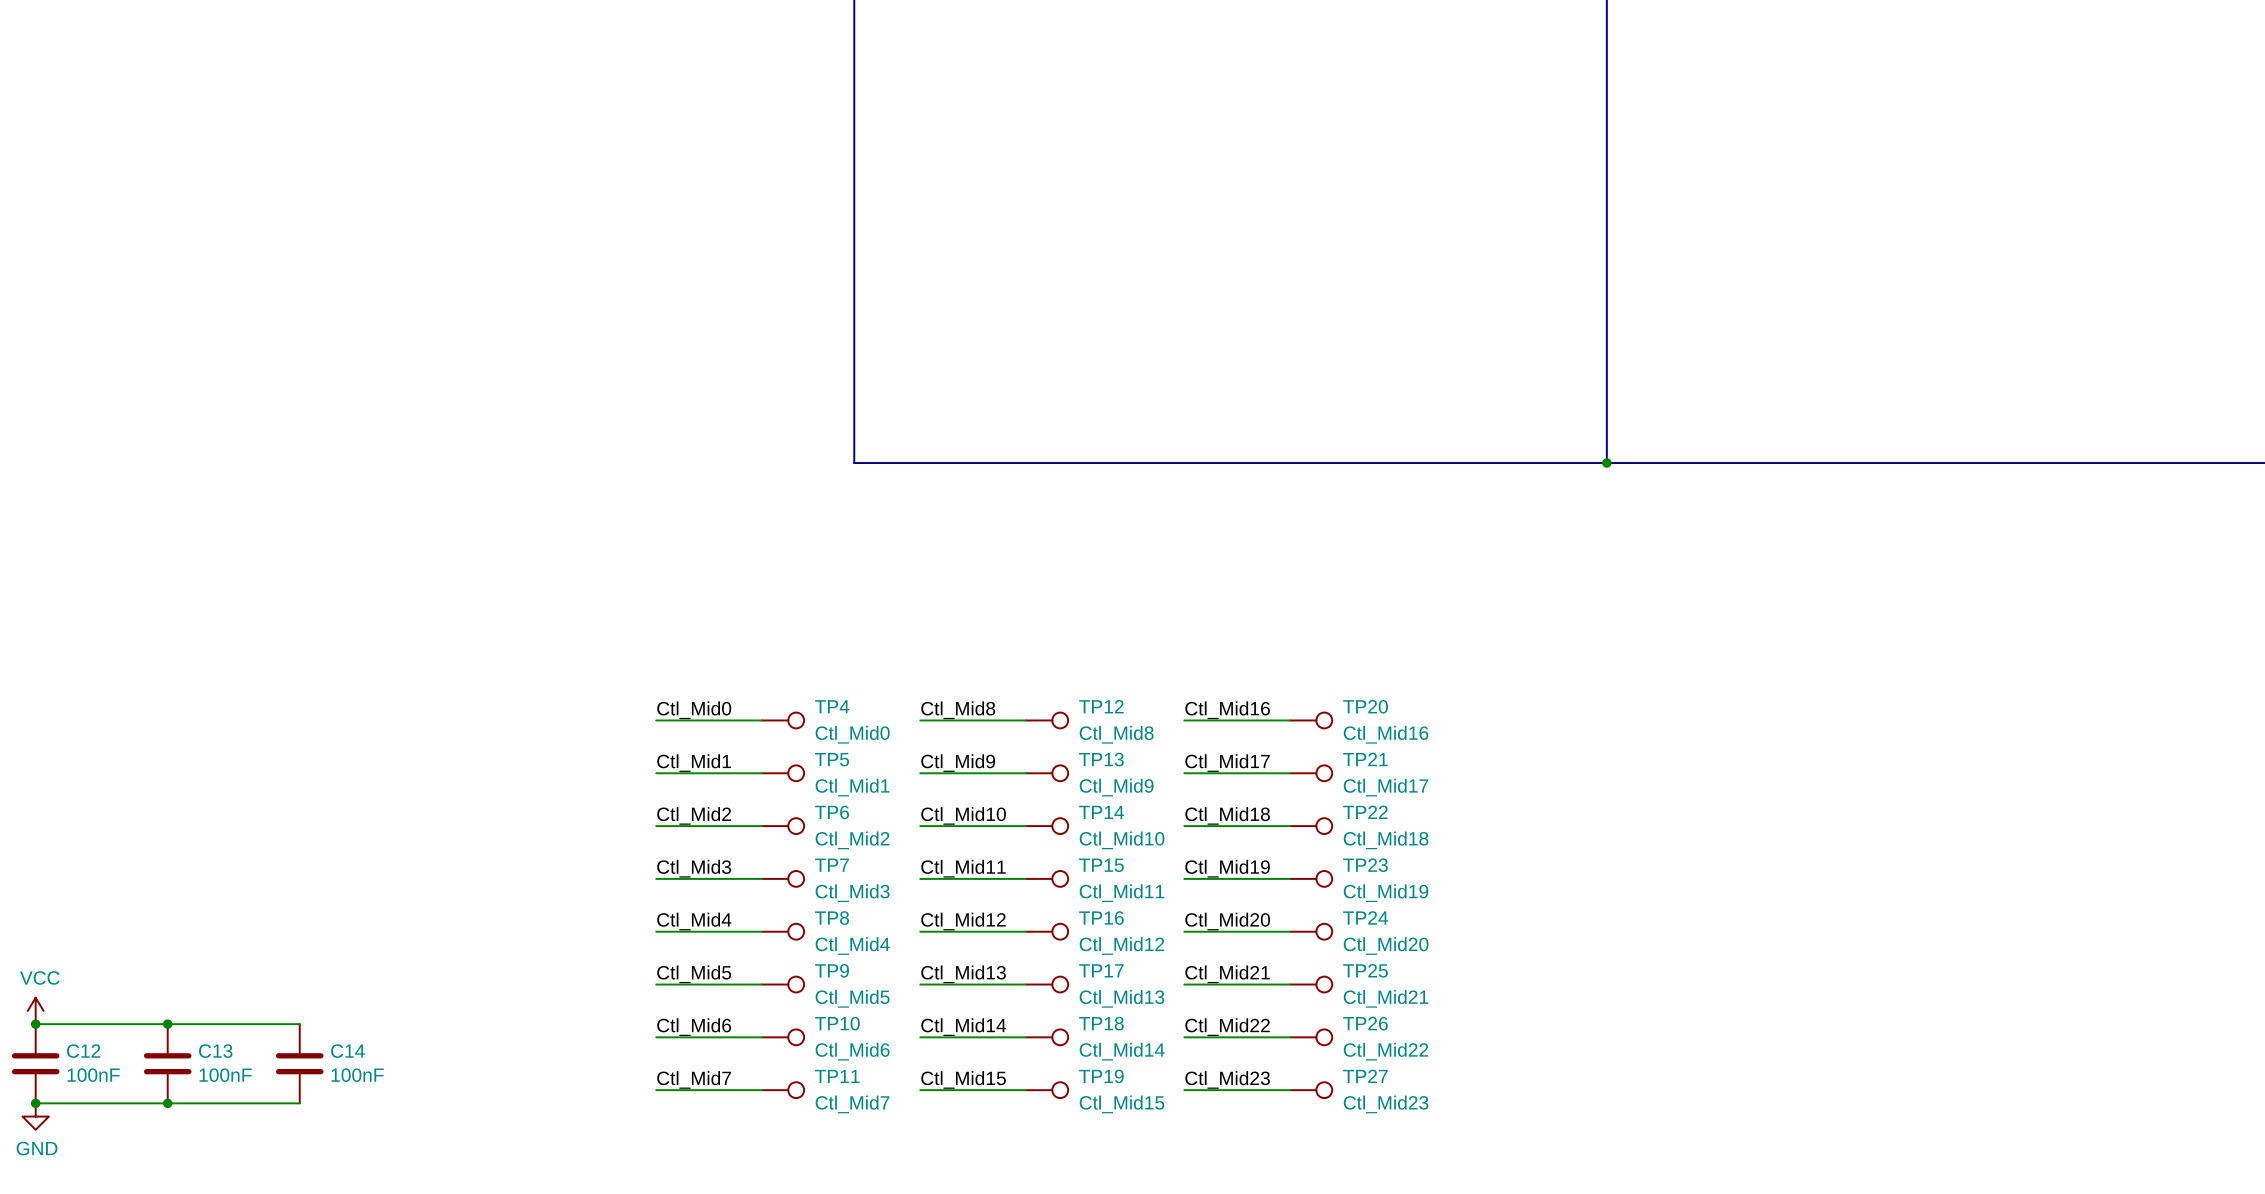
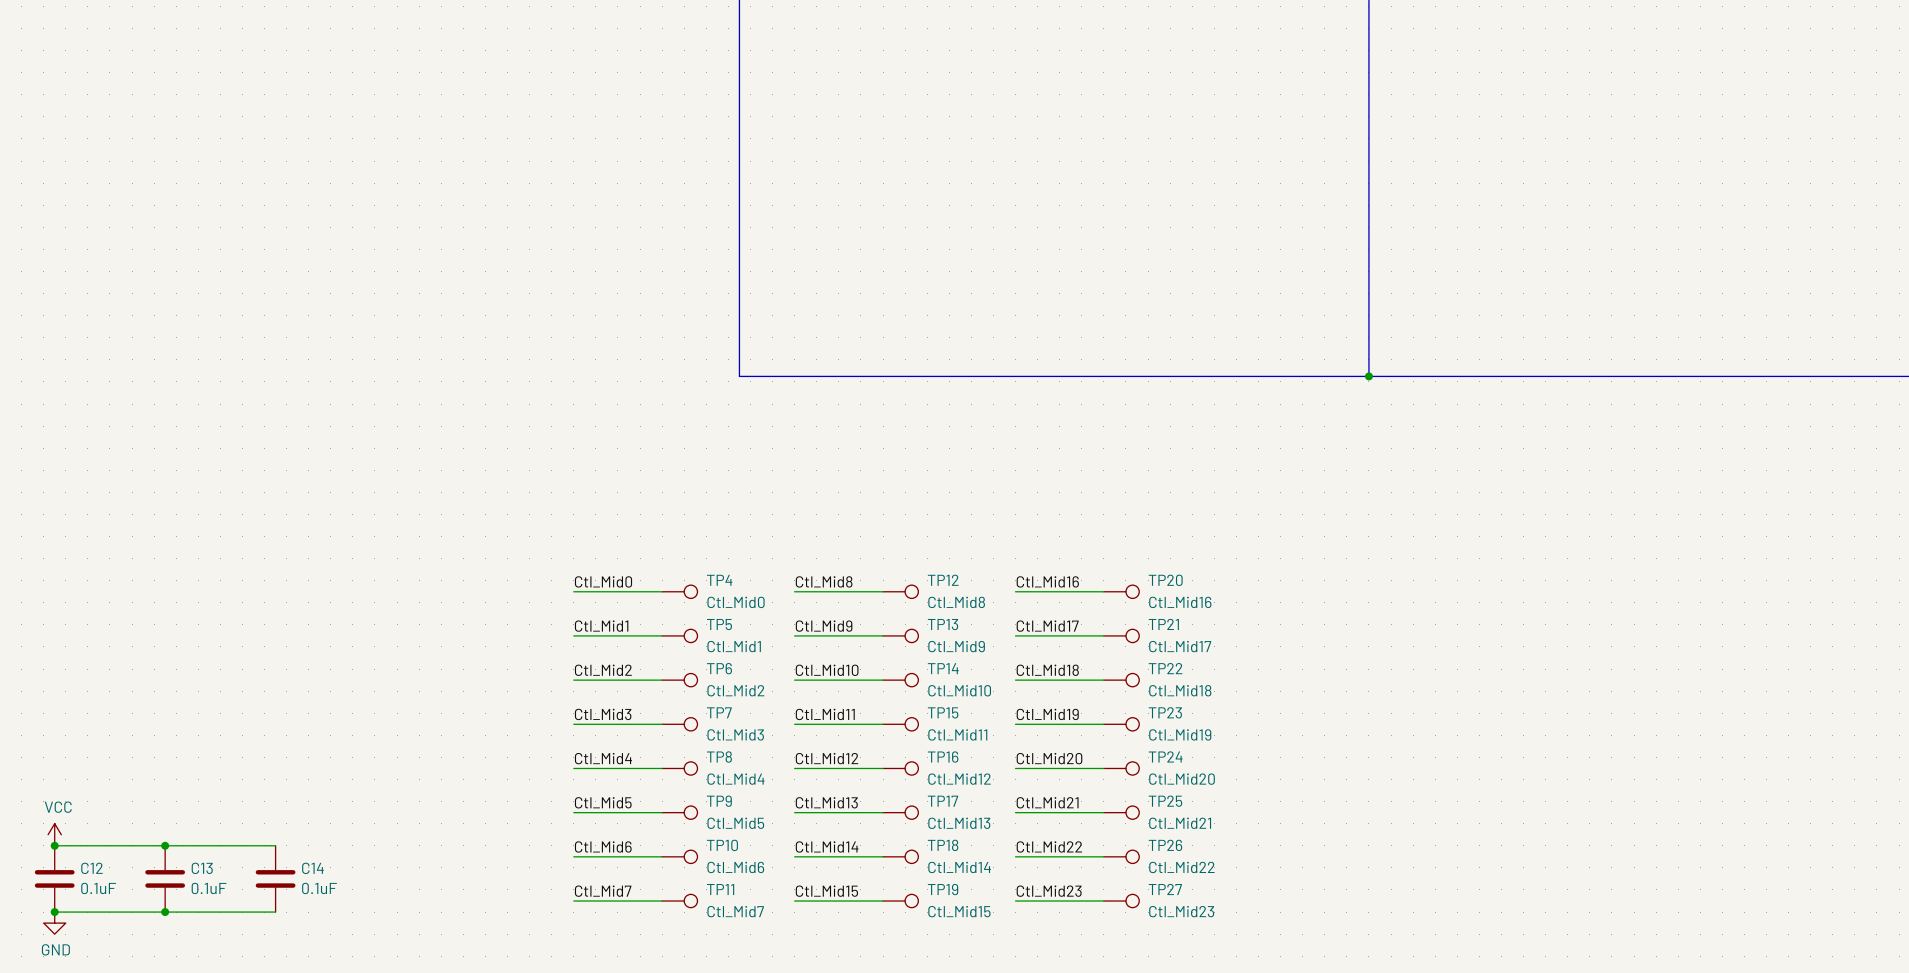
C12 value: 100nF (93, 1075) -> 0.1uF (98, 888)
C13 value: 100nF (225, 1075) -> 0.1uF (209, 888)
C14 value: 100nF (357, 1075) -> 0.1uF (319, 888)

